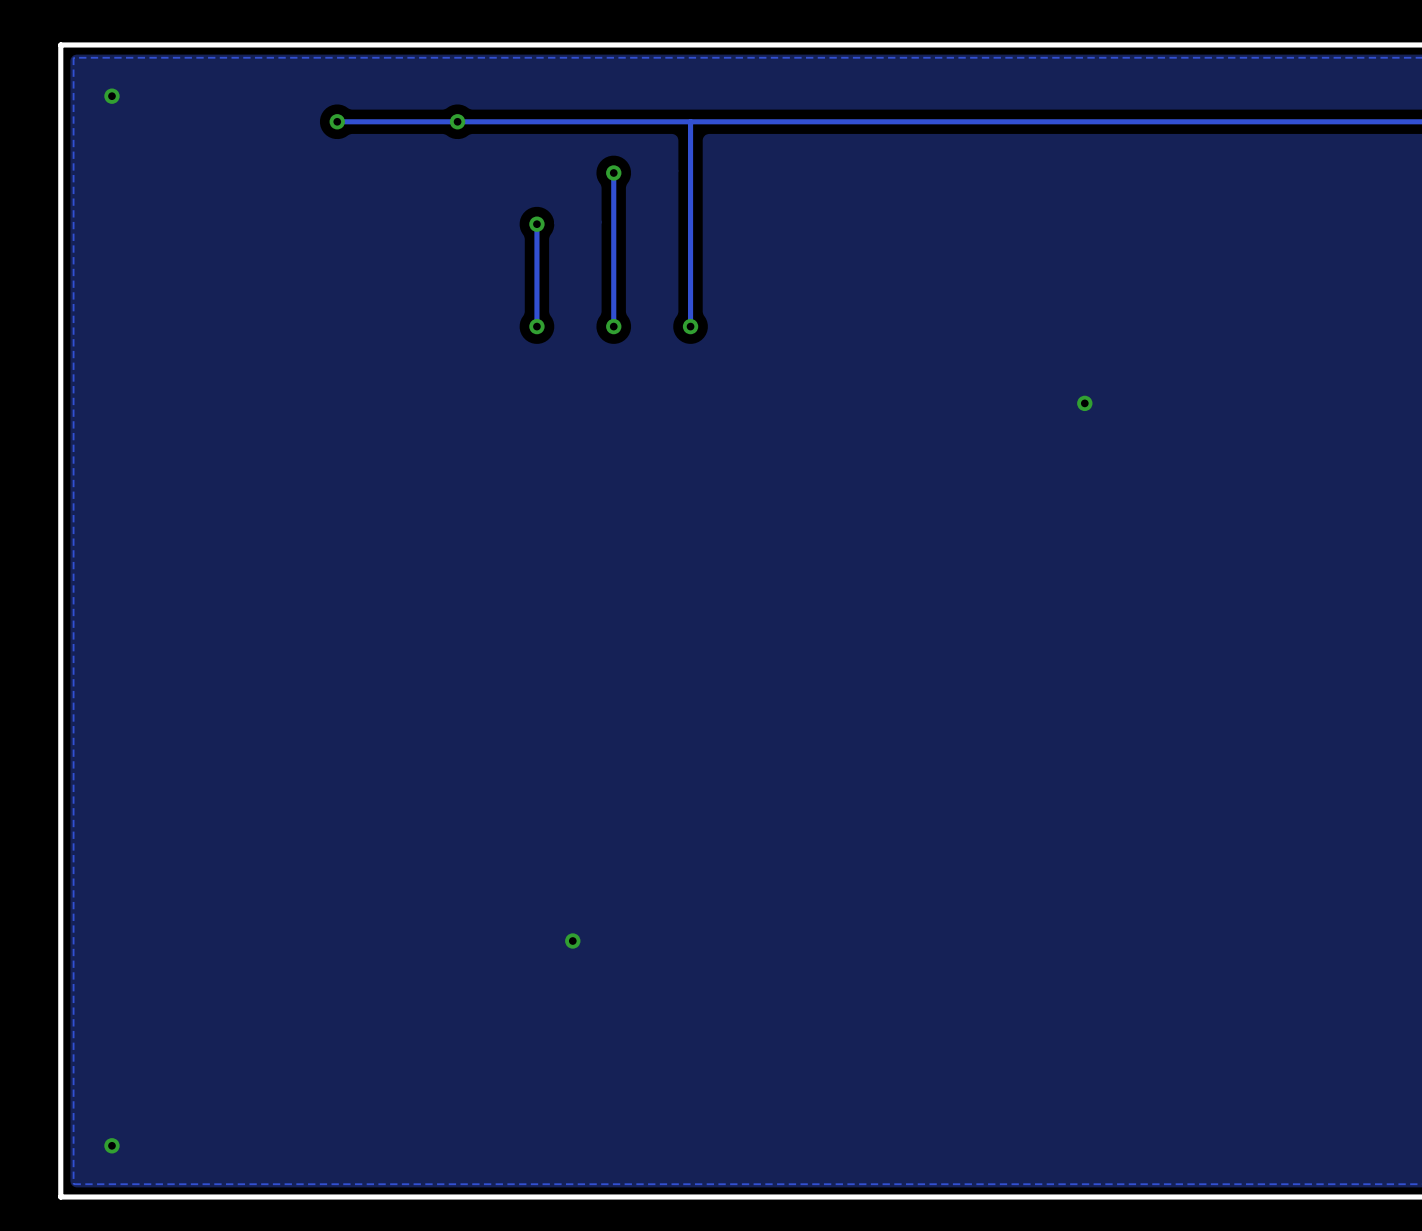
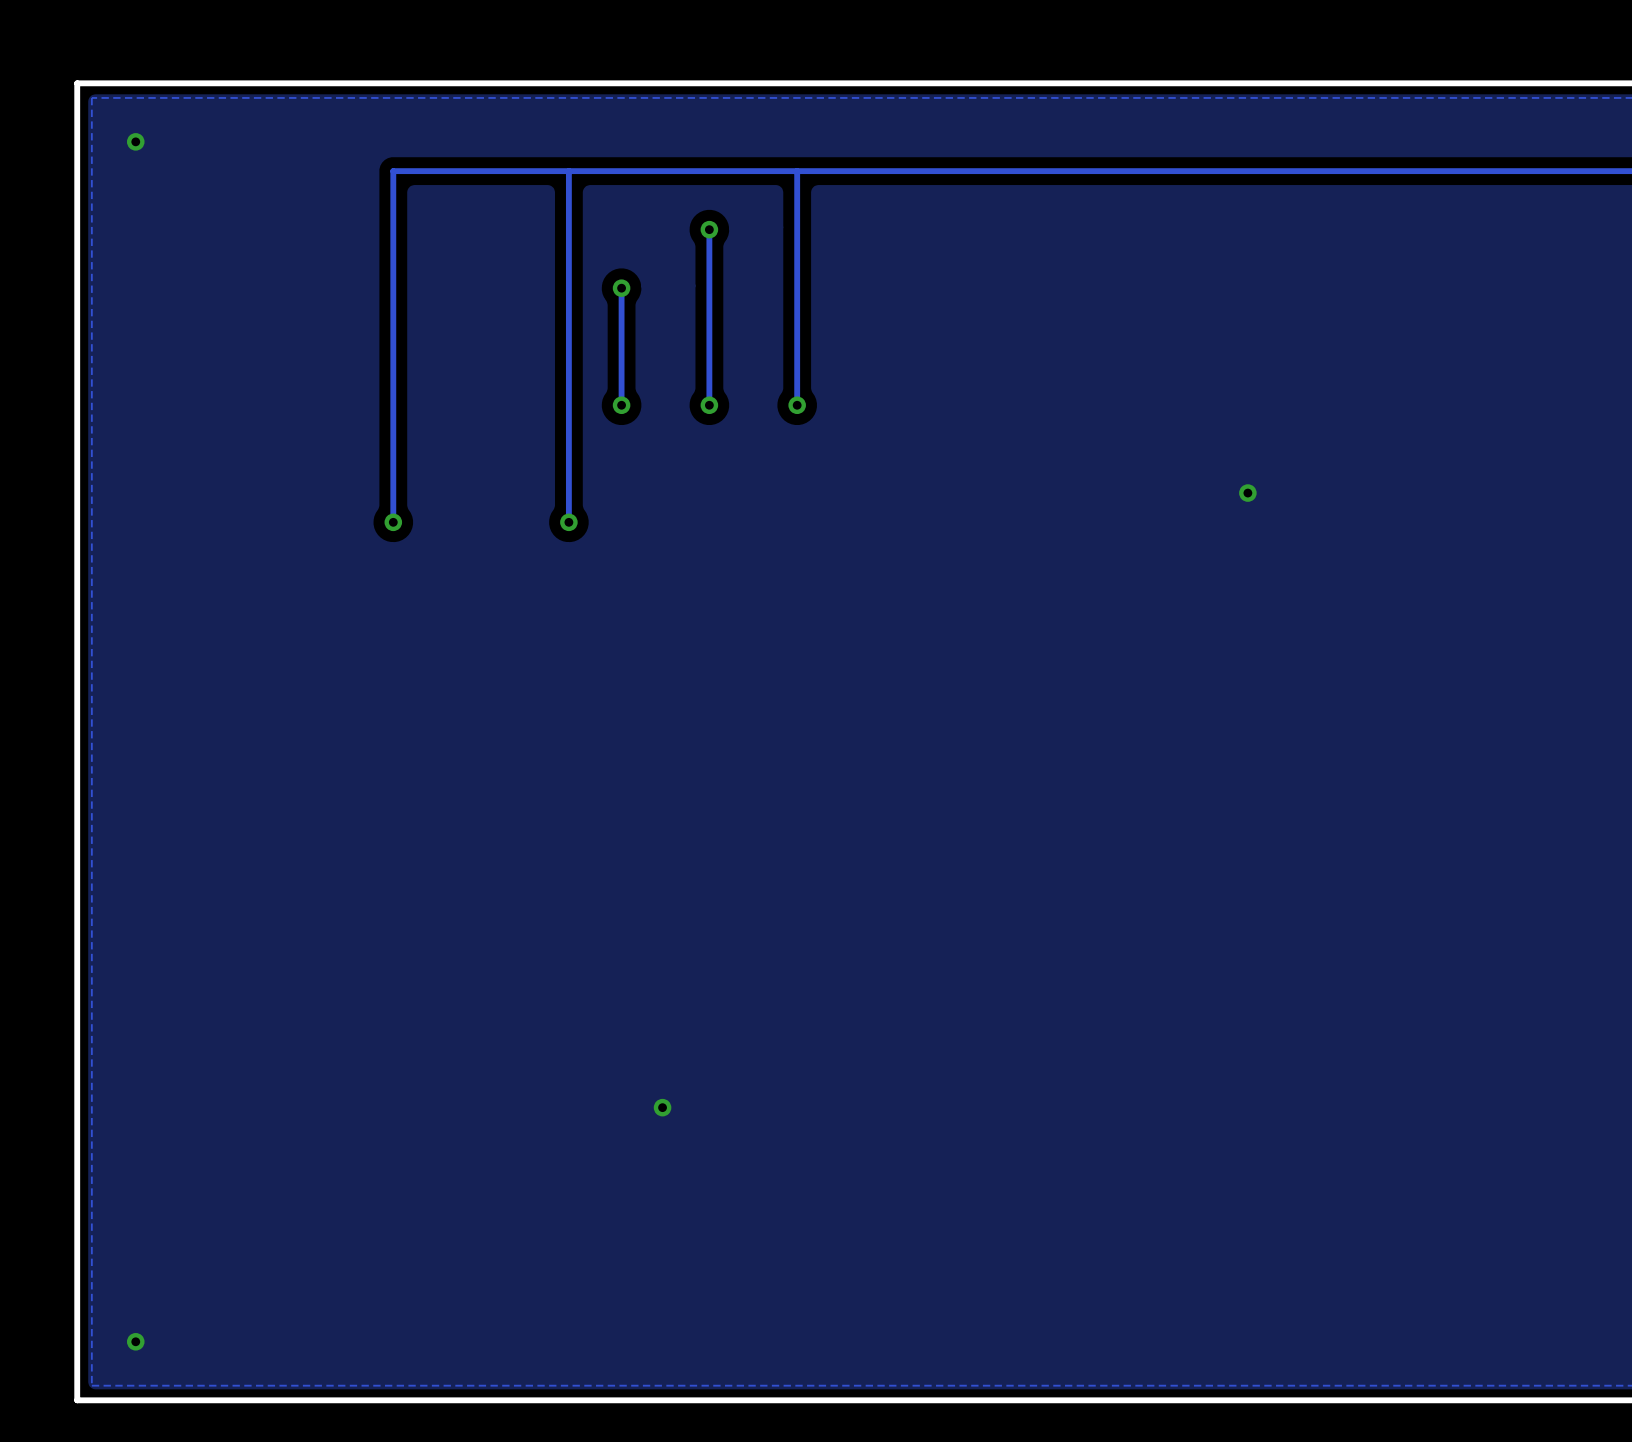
track: none -> (393, 171) (393, 522)
via: (337, 121) -> none
via: (457, 121) -> none
track: none -> (568, 171) (568, 522)
via: none -> (393, 522)
via: none -> (568, 522)

